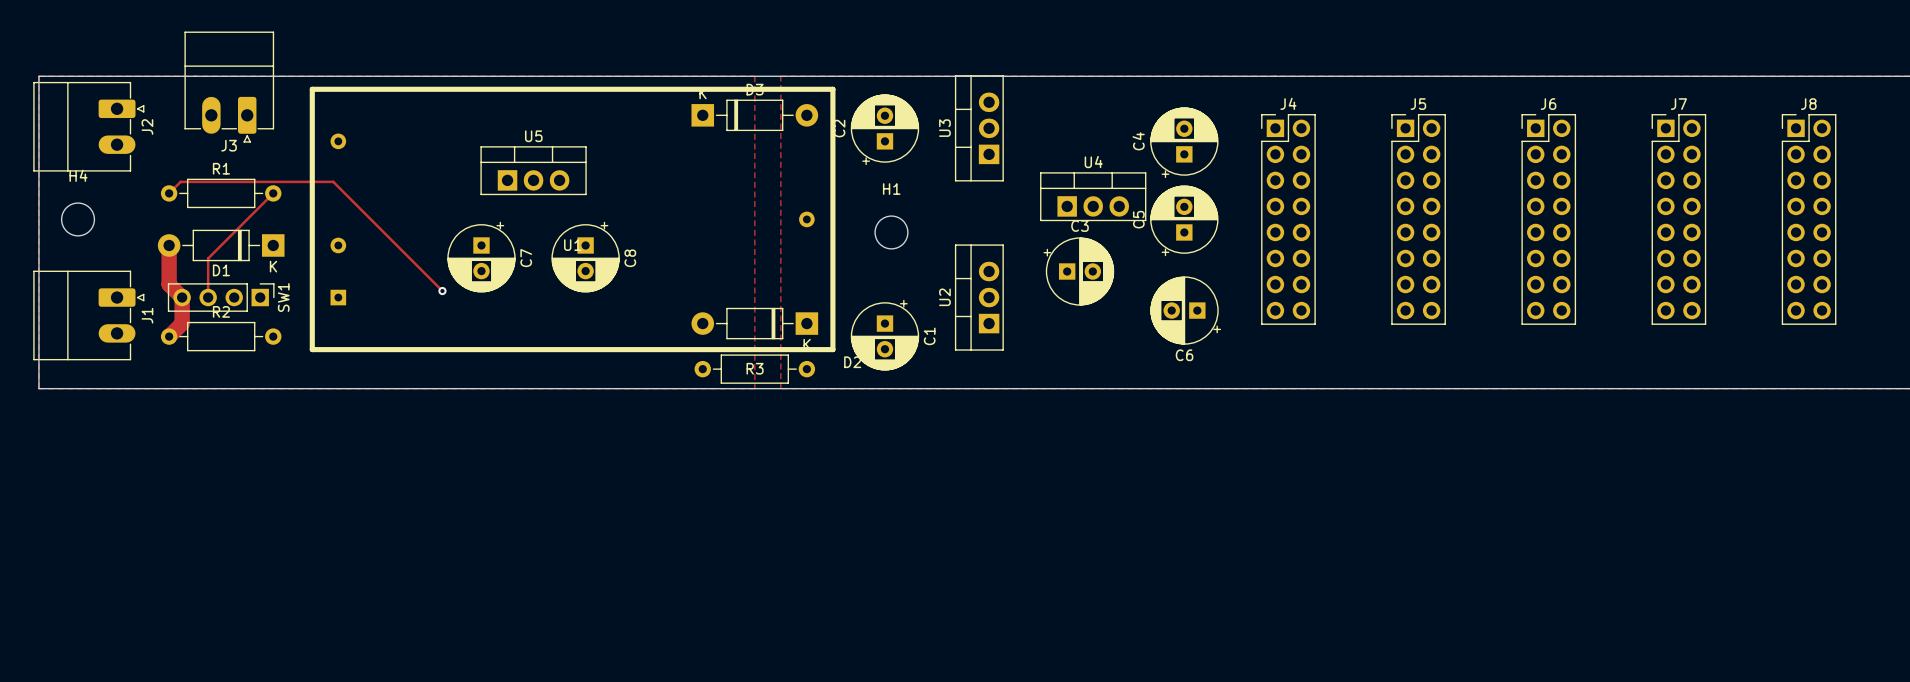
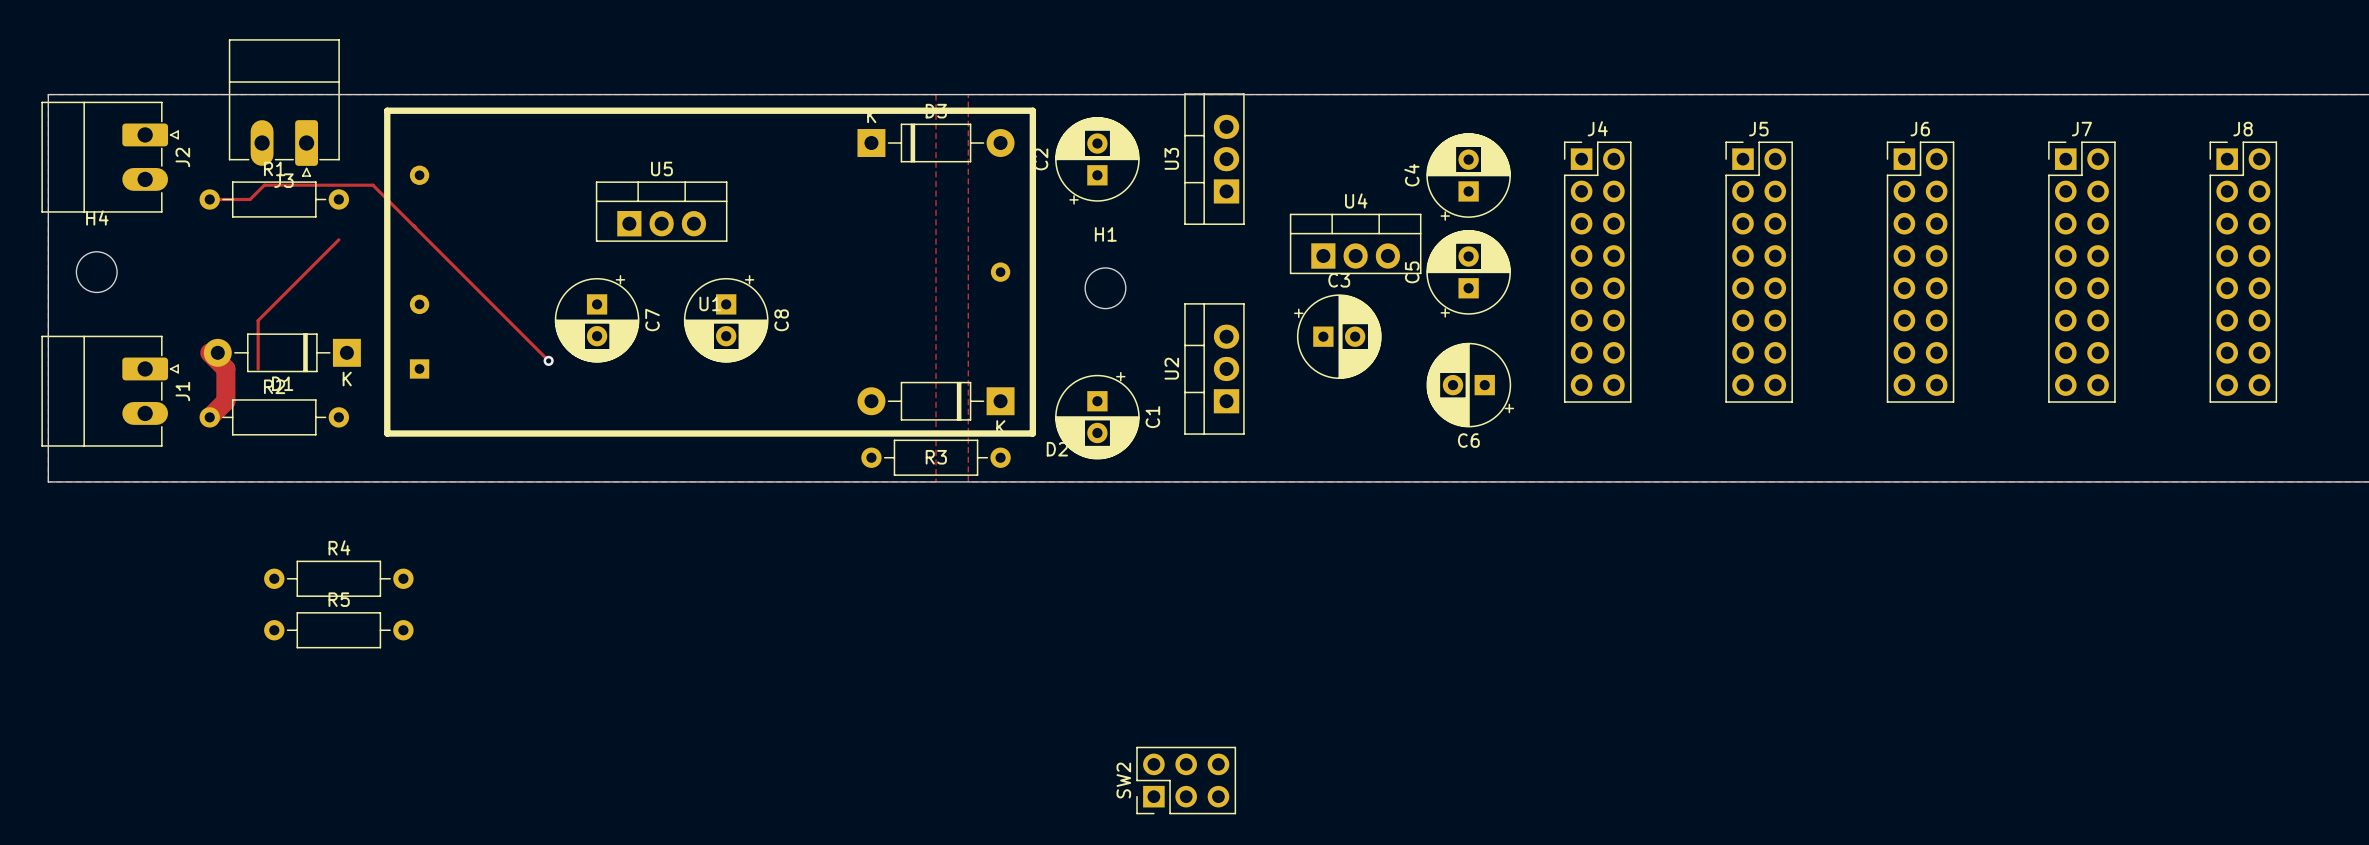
track: (333, 181) (180, 181) (169, 193) -> (413, 225) (372, 185) (264, 185) (250, 199) (209, 199)
R1 position: (221, 193) -> (274, 199)
track: (169, 245) (169, 284) -> none
D1 position: (221, 245) -> (282, 352)
SW1: (221, 297) -> none
R4: none -> (338, 578)
R5: none -> (338, 630)
SW2: none -> (1186, 780)

